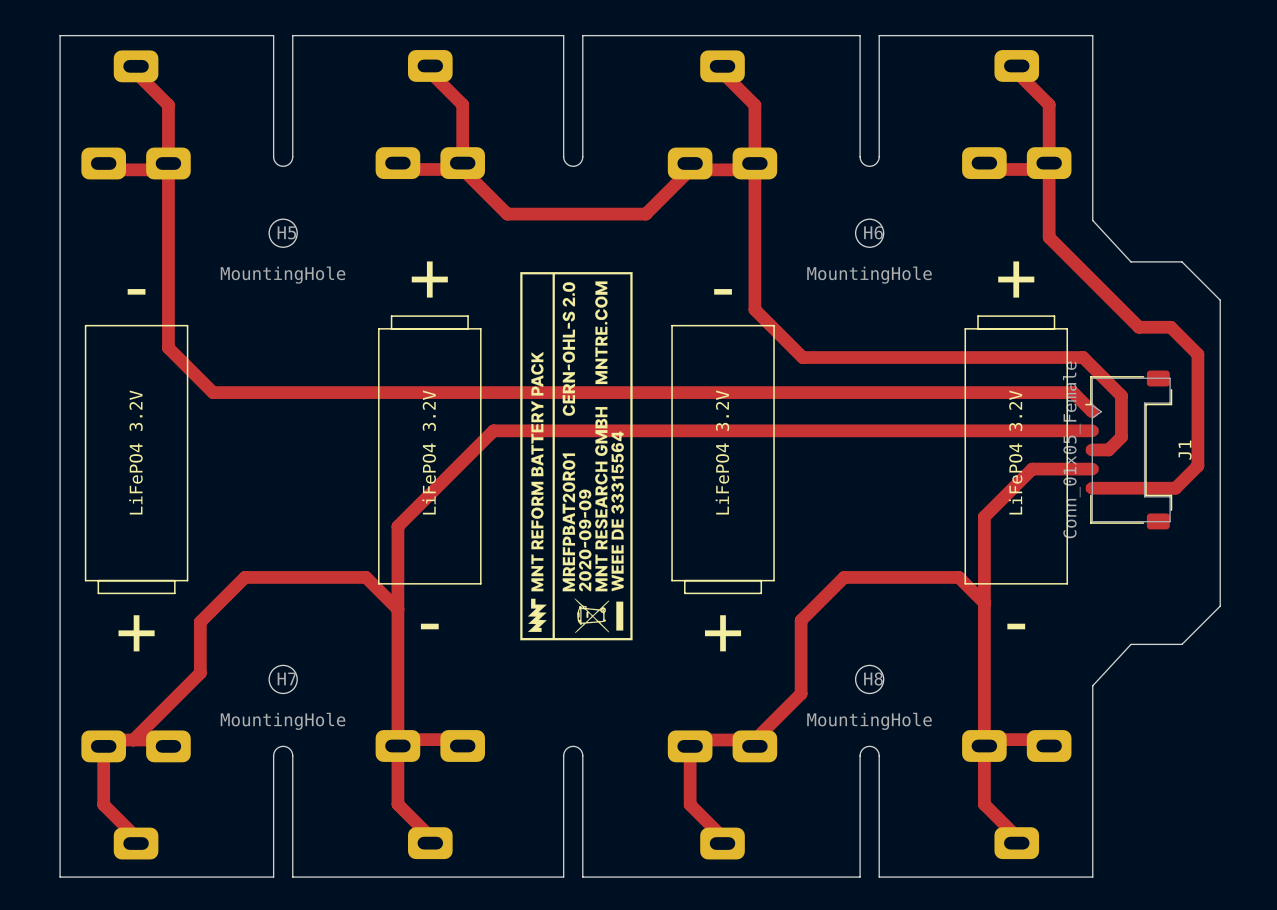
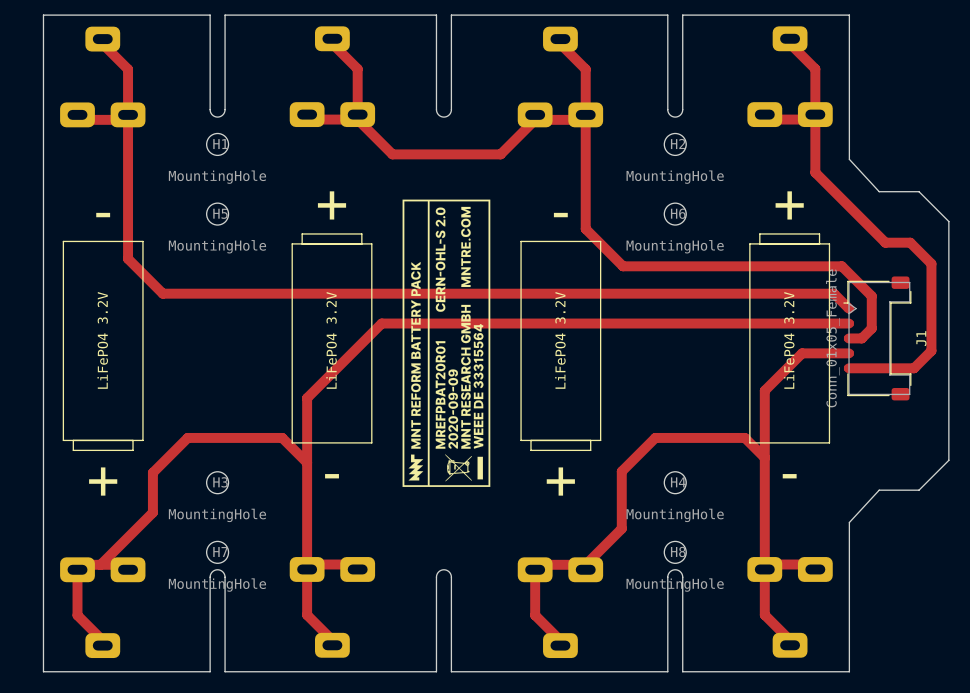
H1: none -> MountingHole (217, 144)
H2: none -> MountingHole (675, 144)
H5 position: (283, 233) -> (217, 214)
H6 position: (869, 233) -> (675, 214)
H3: none -> MountingHole (217, 482)
H4: none -> MountingHole (675, 482)
H7 position: (283, 679) -> (217, 552)
H8 position: (869, 679) -> (675, 552)

